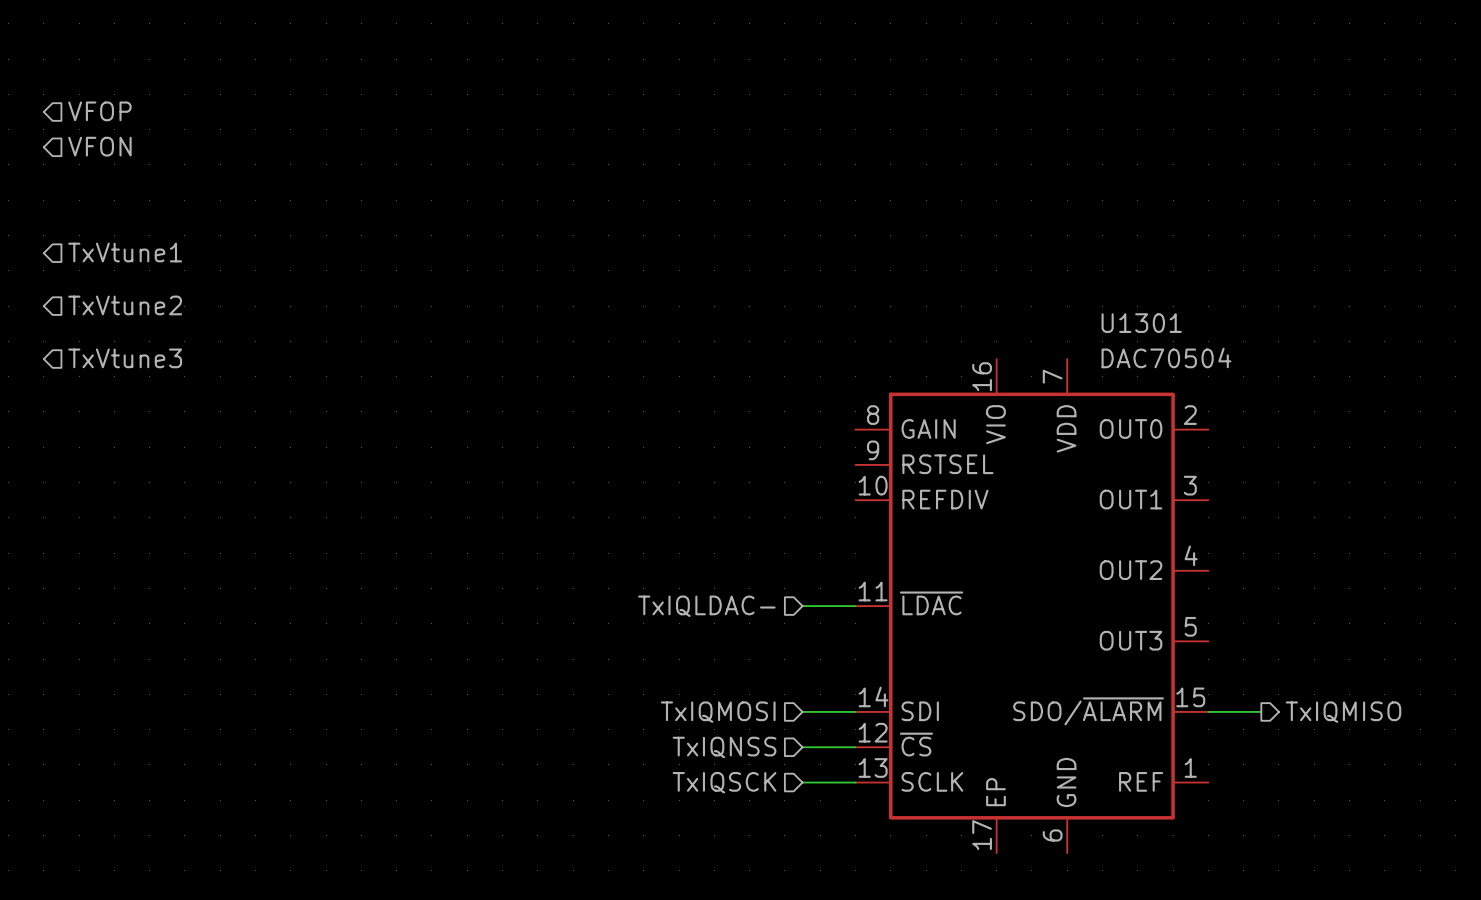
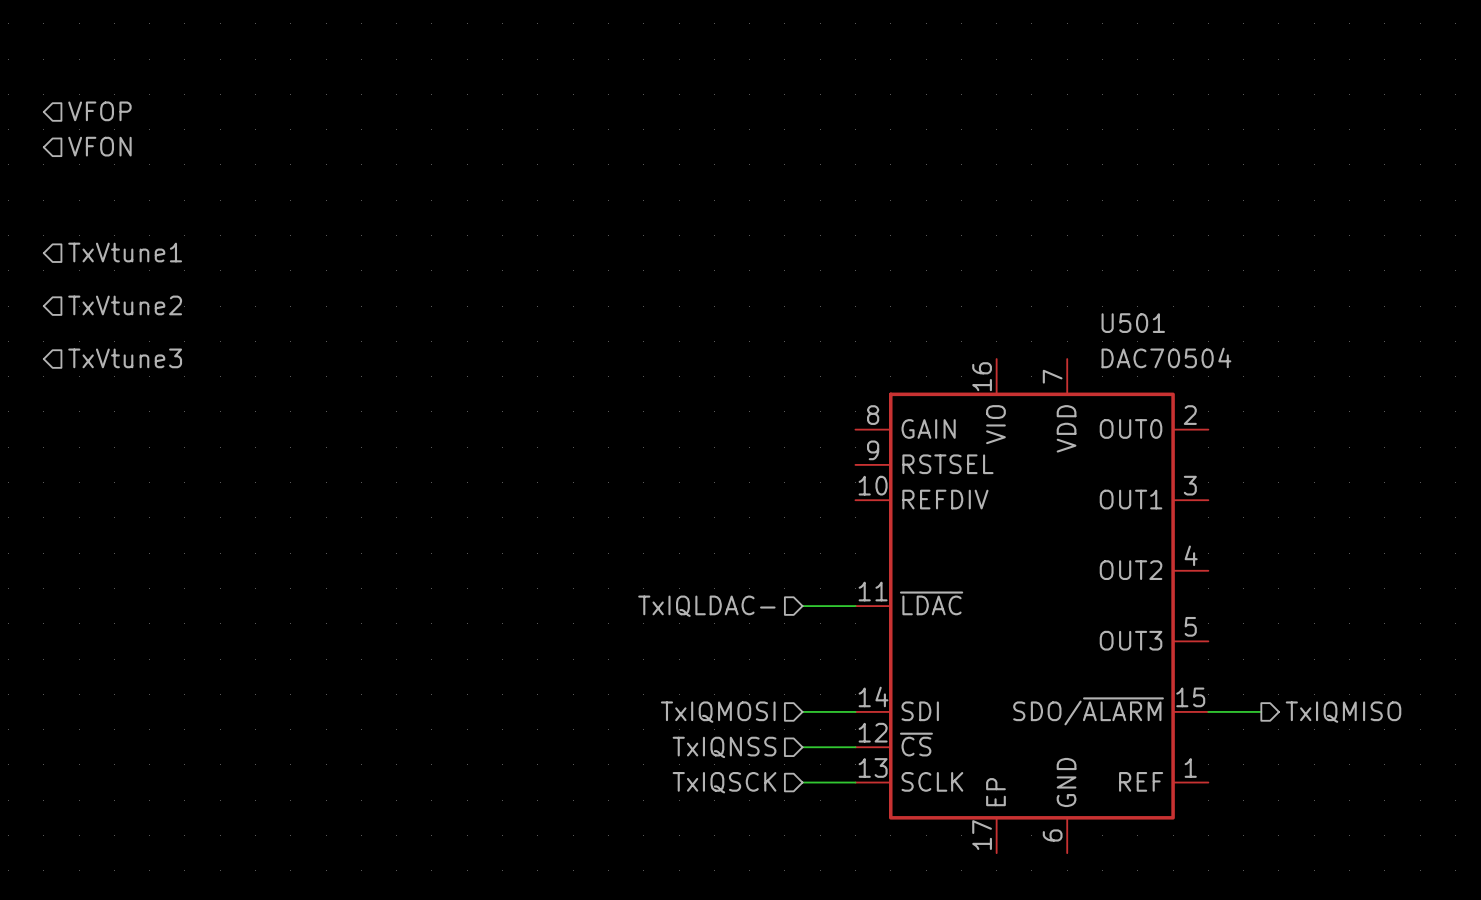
U1301 name: U1301 (1141, 323) -> U501 (1133, 323)

